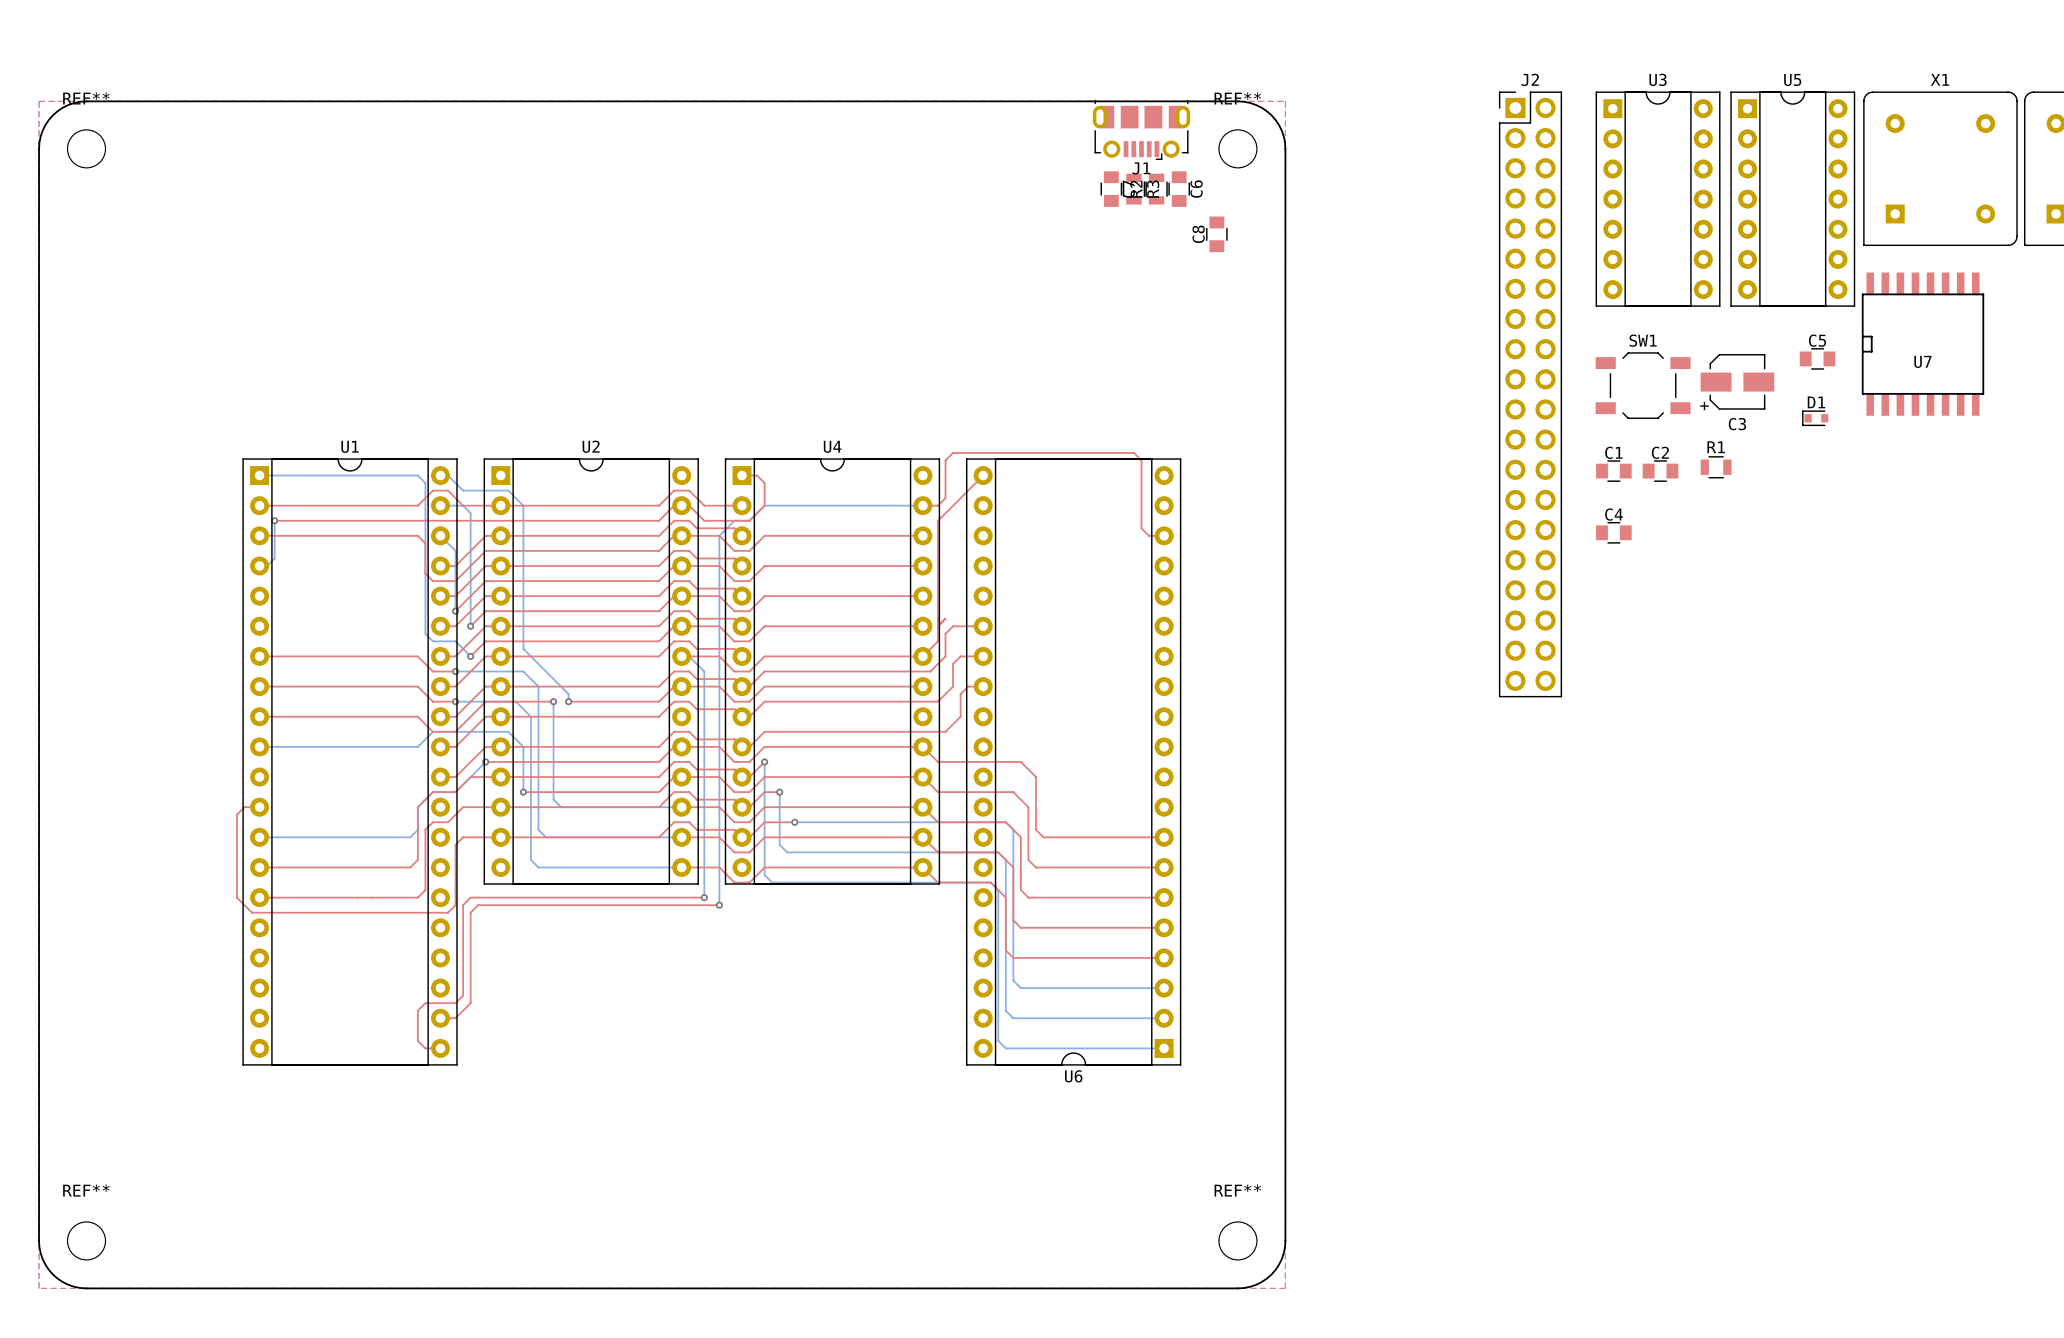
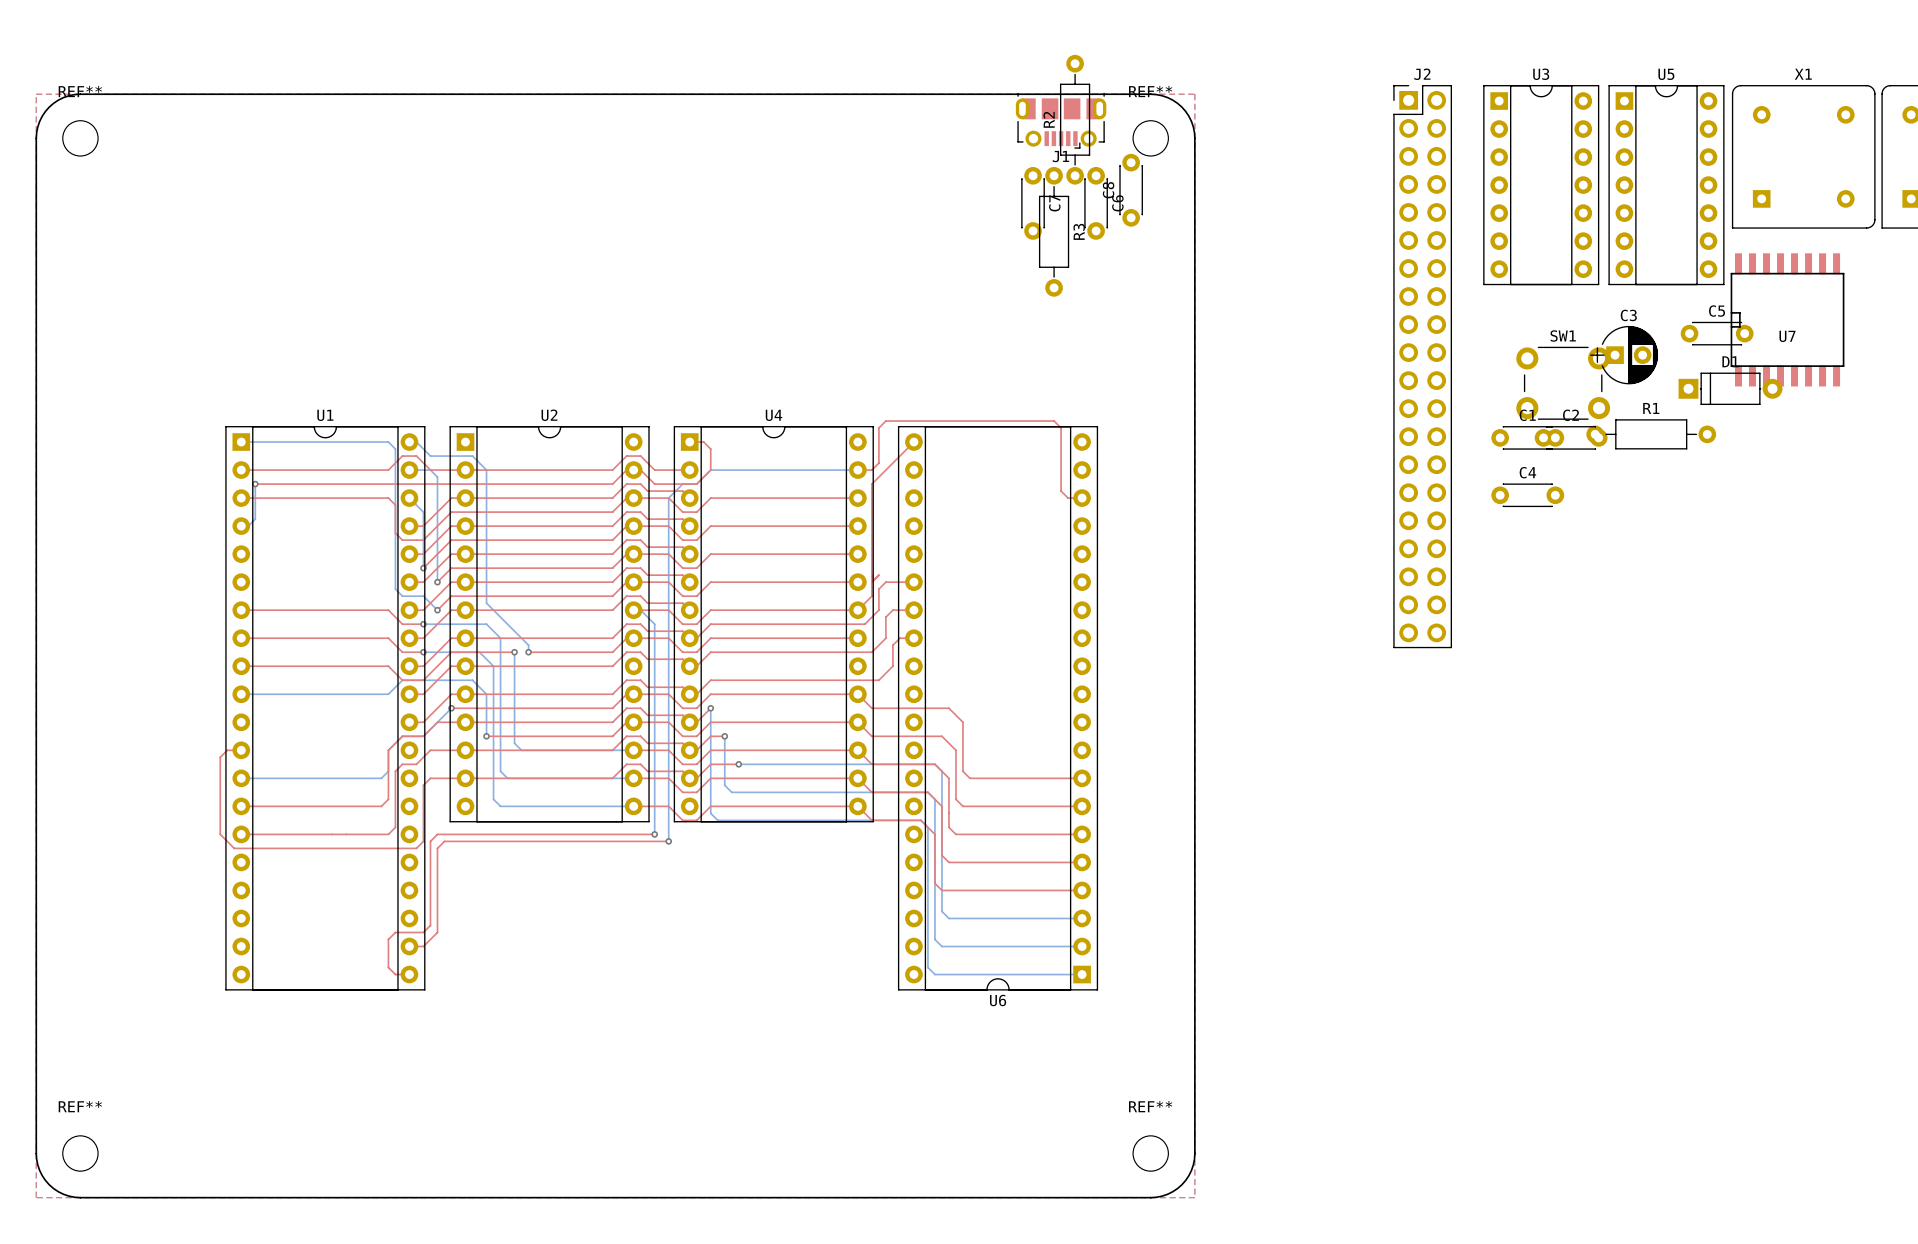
C7 footprint: [1100, 171, 1123, 207] -> [1021, 166, 1045, 240]
C6 footprint: [1168, 171, 1190, 207] -> [1084, 166, 1108, 240]
R3 footprint: [1122, 173, 1146, 205] -> [1038, 166, 1070, 297]
R2 footprint: [1145, 173, 1168, 205] -> [1059, 54, 1091, 185]
C8 footprint: [1206, 216, 1228, 253] -> [1119, 153, 1143, 227]
C5 footprint: [1799, 348, 1836, 370] -> [1680, 321, 1754, 346]
SW1 footprint: [1595, 352, 1691, 419] -> [1516, 346, 1611, 420]
C3 footprint: [1700, 354, 1775, 410] -> [1590, 325, 1659, 385]
D1 footprint: [1802, 410, 1829, 427] -> [1678, 372, 1783, 406]
C3 name position: C3 (1737, 424) -> C3 (1628, 315)
R1 footprint: [1700, 456, 1732, 479] -> [1586, 419, 1717, 450]
C1 footprint: [1596, 460, 1632, 482] -> [1491, 426, 1565, 450]
C2 footprint: [1642, 460, 1679, 482] -> [1534, 426, 1608, 450]
C4 footprint: [1596, 522, 1632, 544] -> [1491, 483, 1565, 508]

